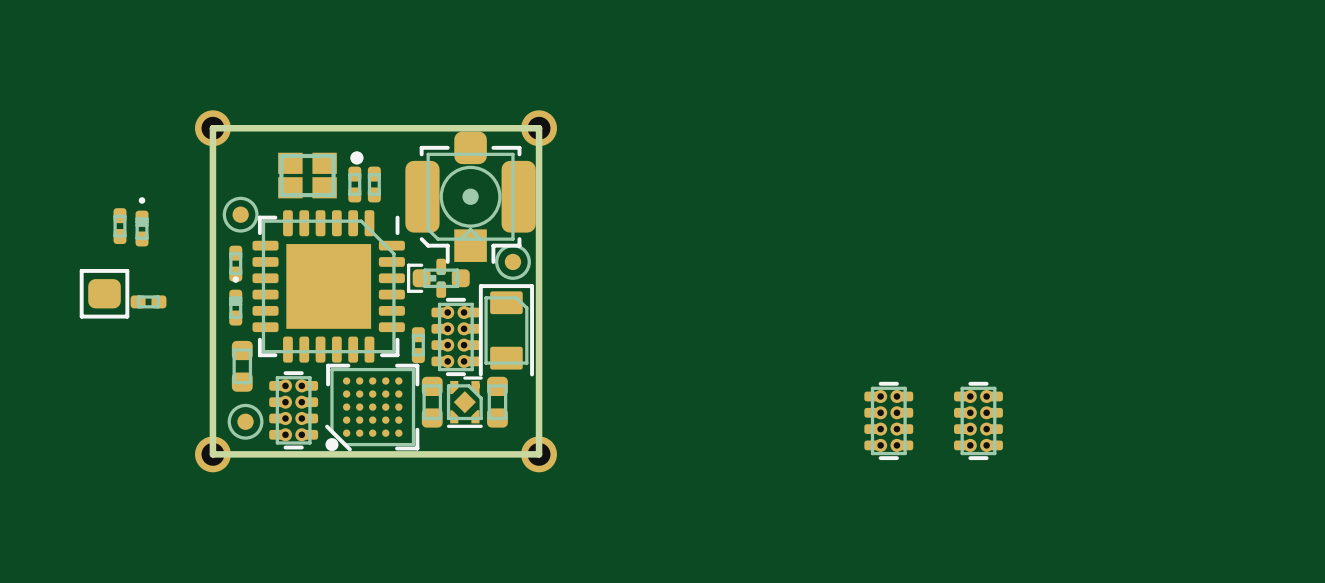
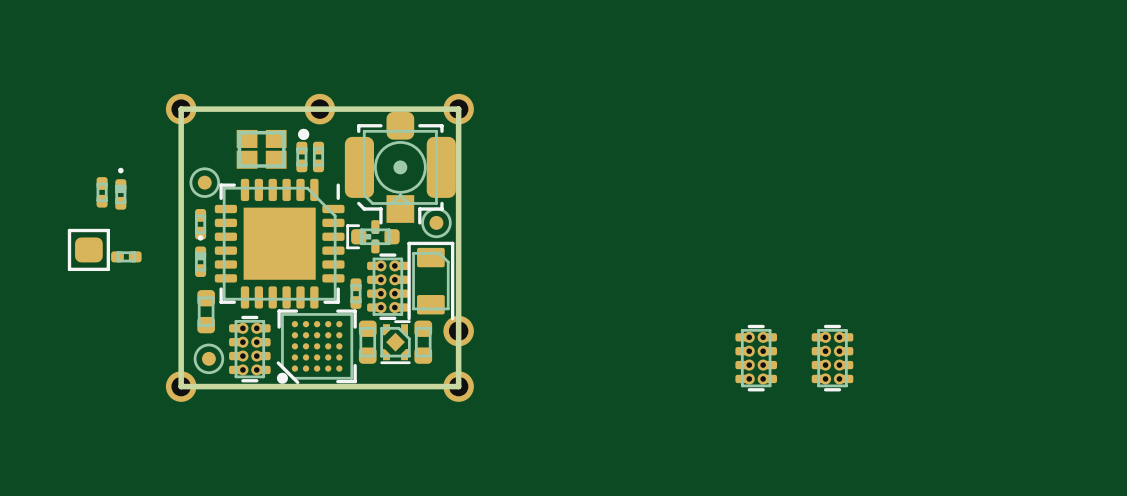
part: none -> (319, 109)
part: none -> (458, 331)

